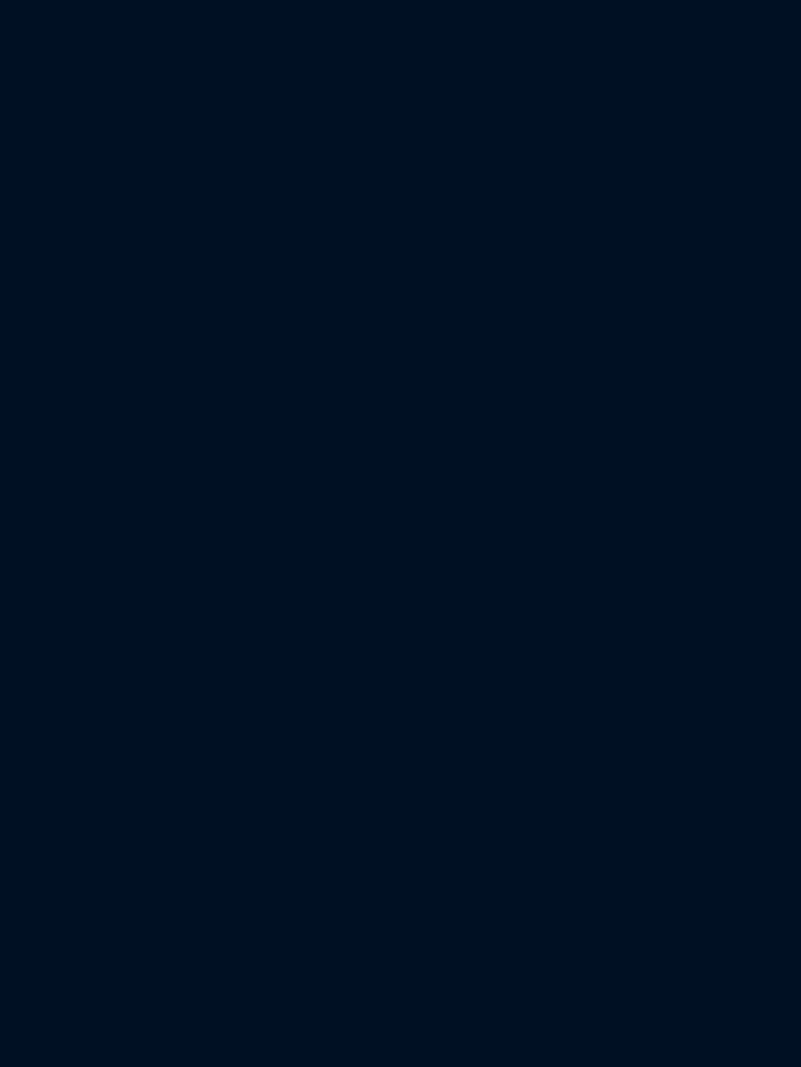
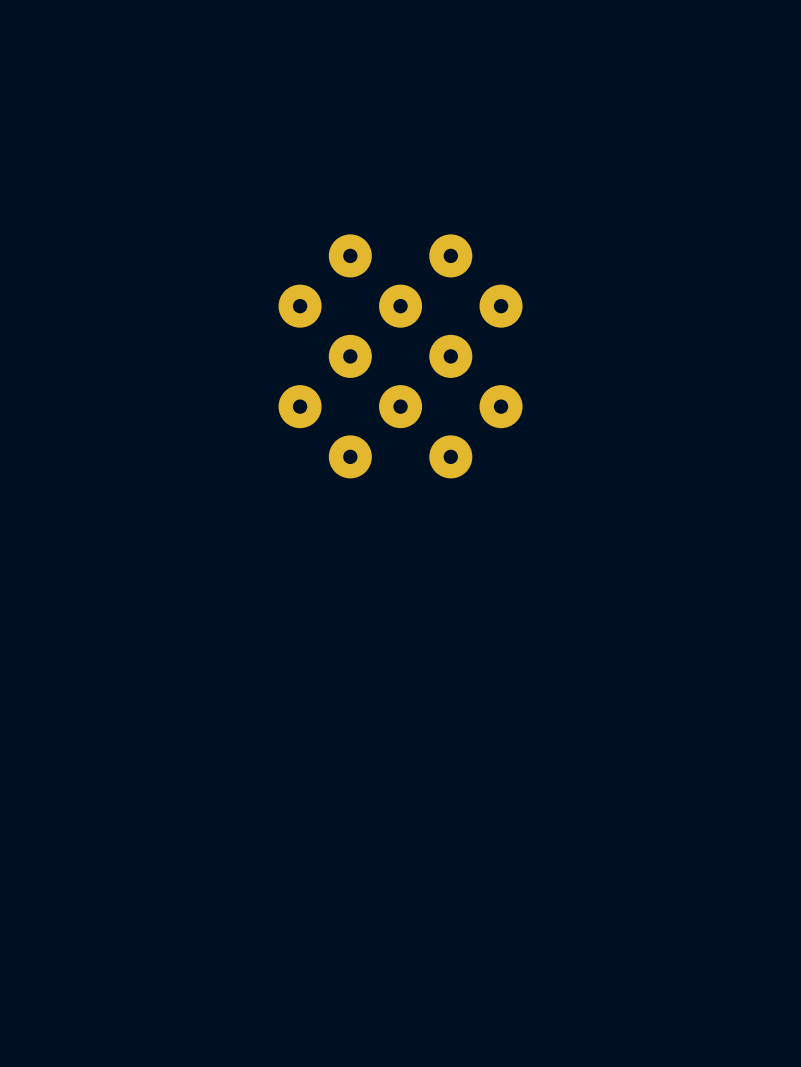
part: none -> (400, 356)

